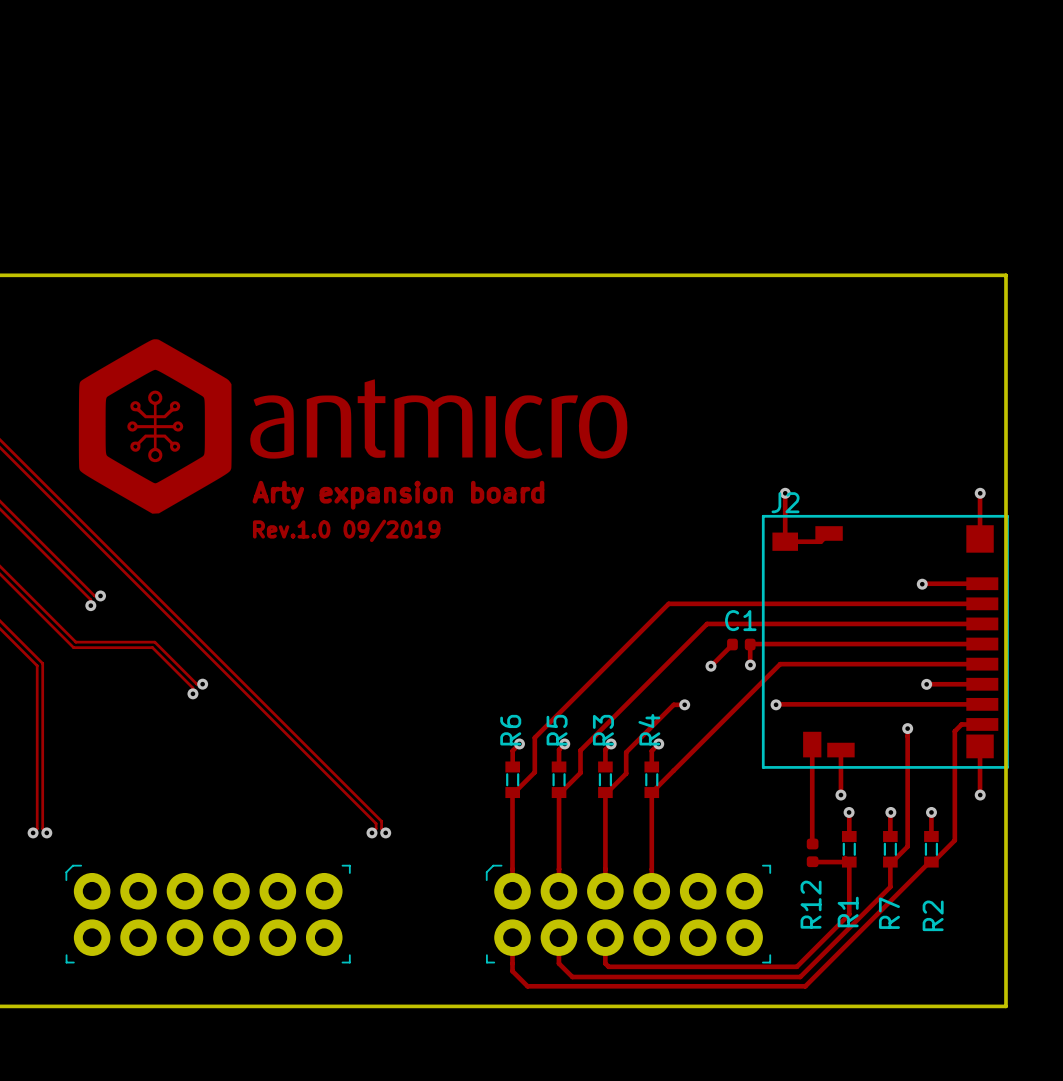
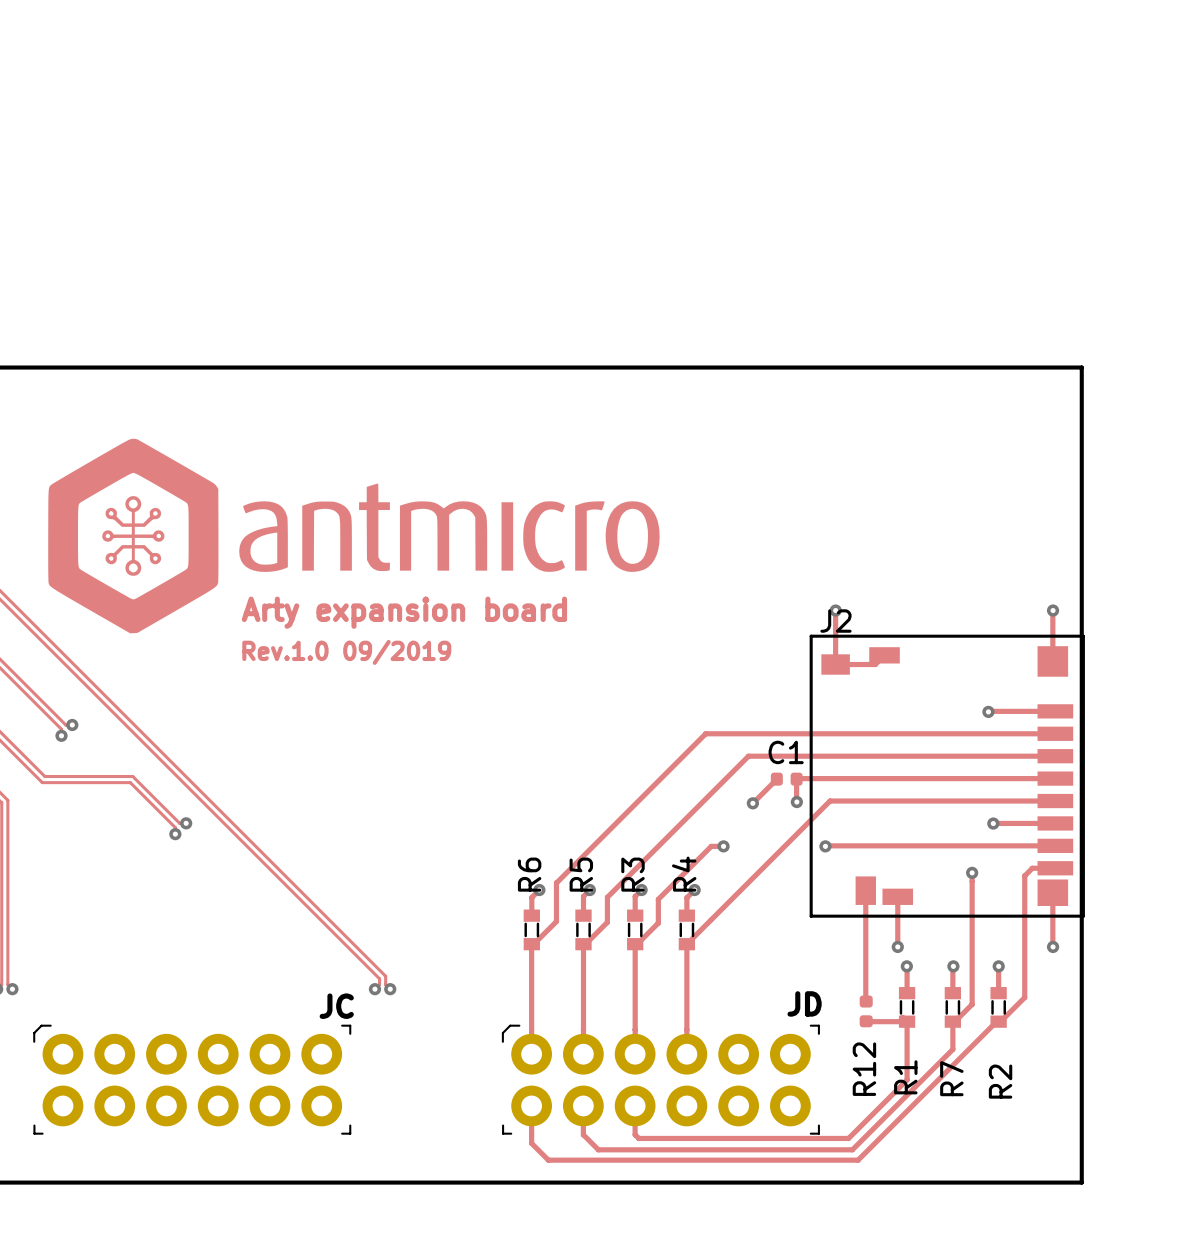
text: none -> JD (804, 1003)
text: none -> JC (336, 1006)

